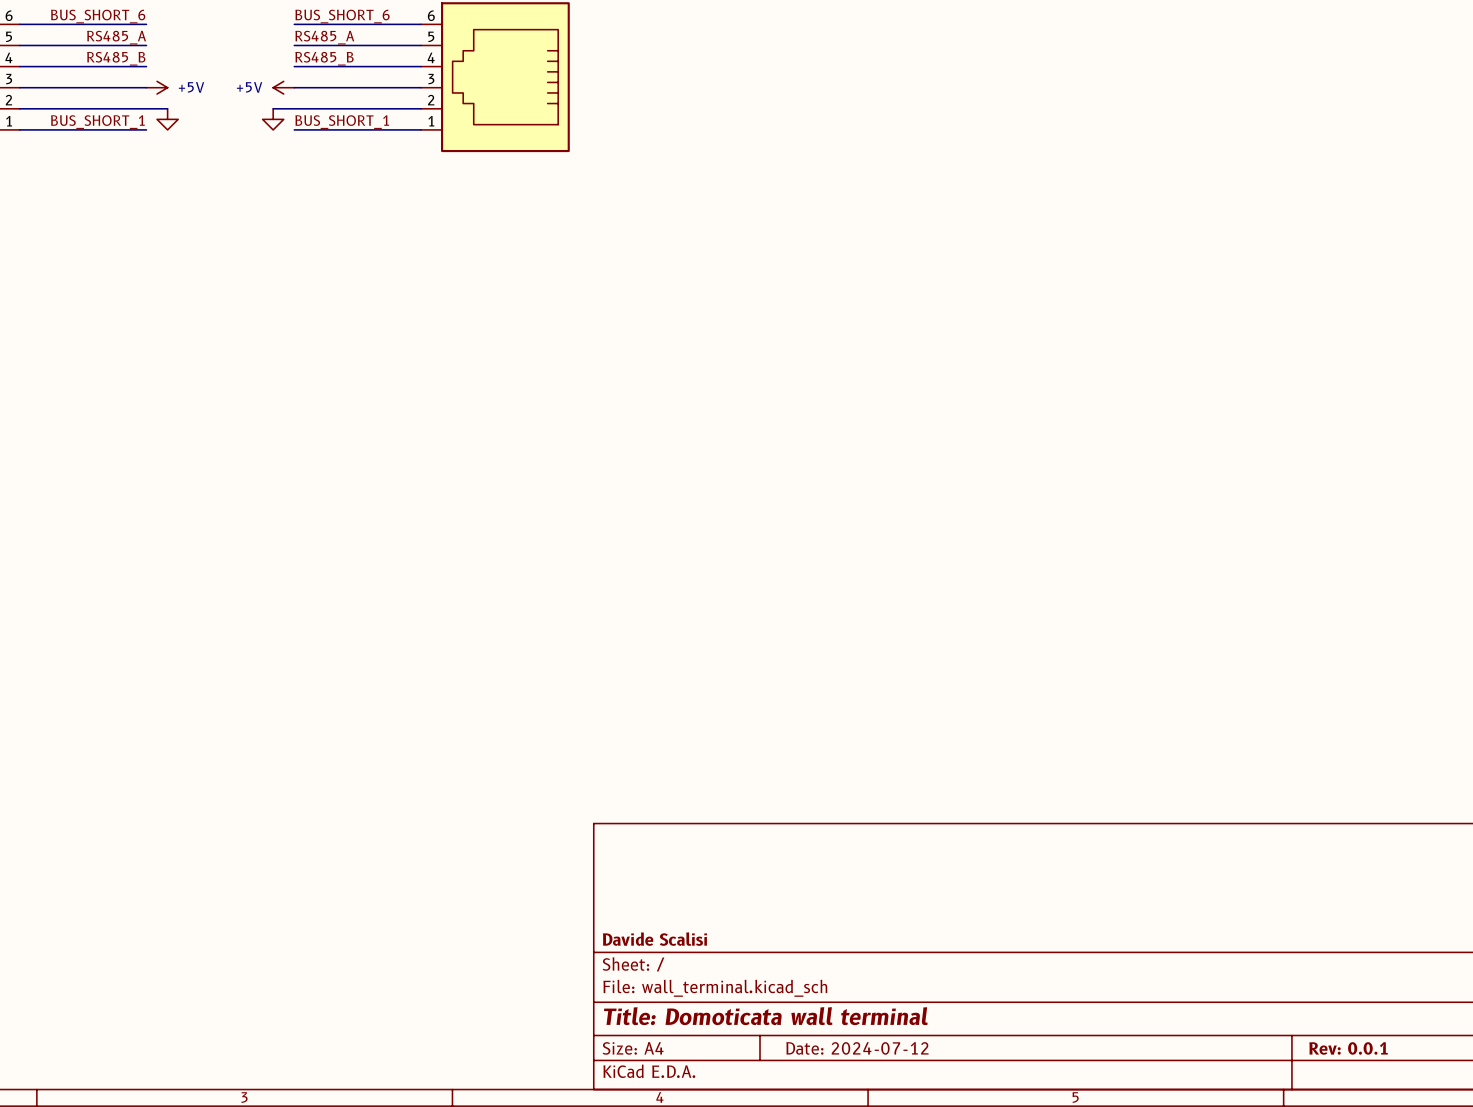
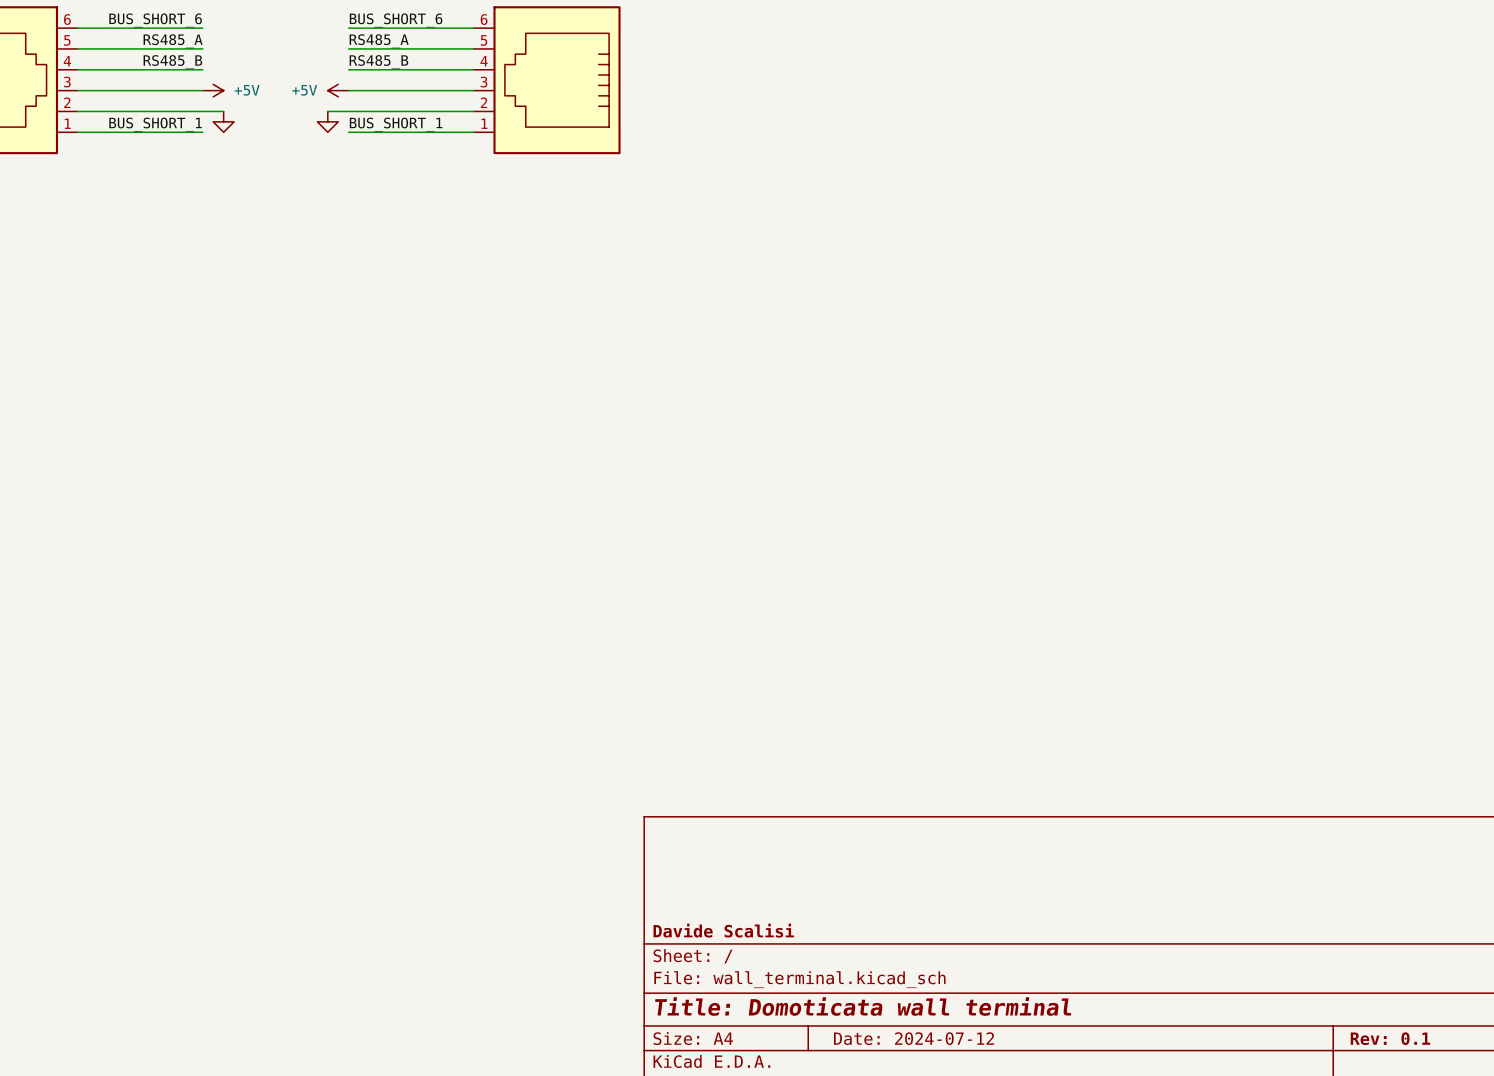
title block: Rev: 0.0.1 (1348, 1048) -> Rev: 0.1 (1390, 1038)

